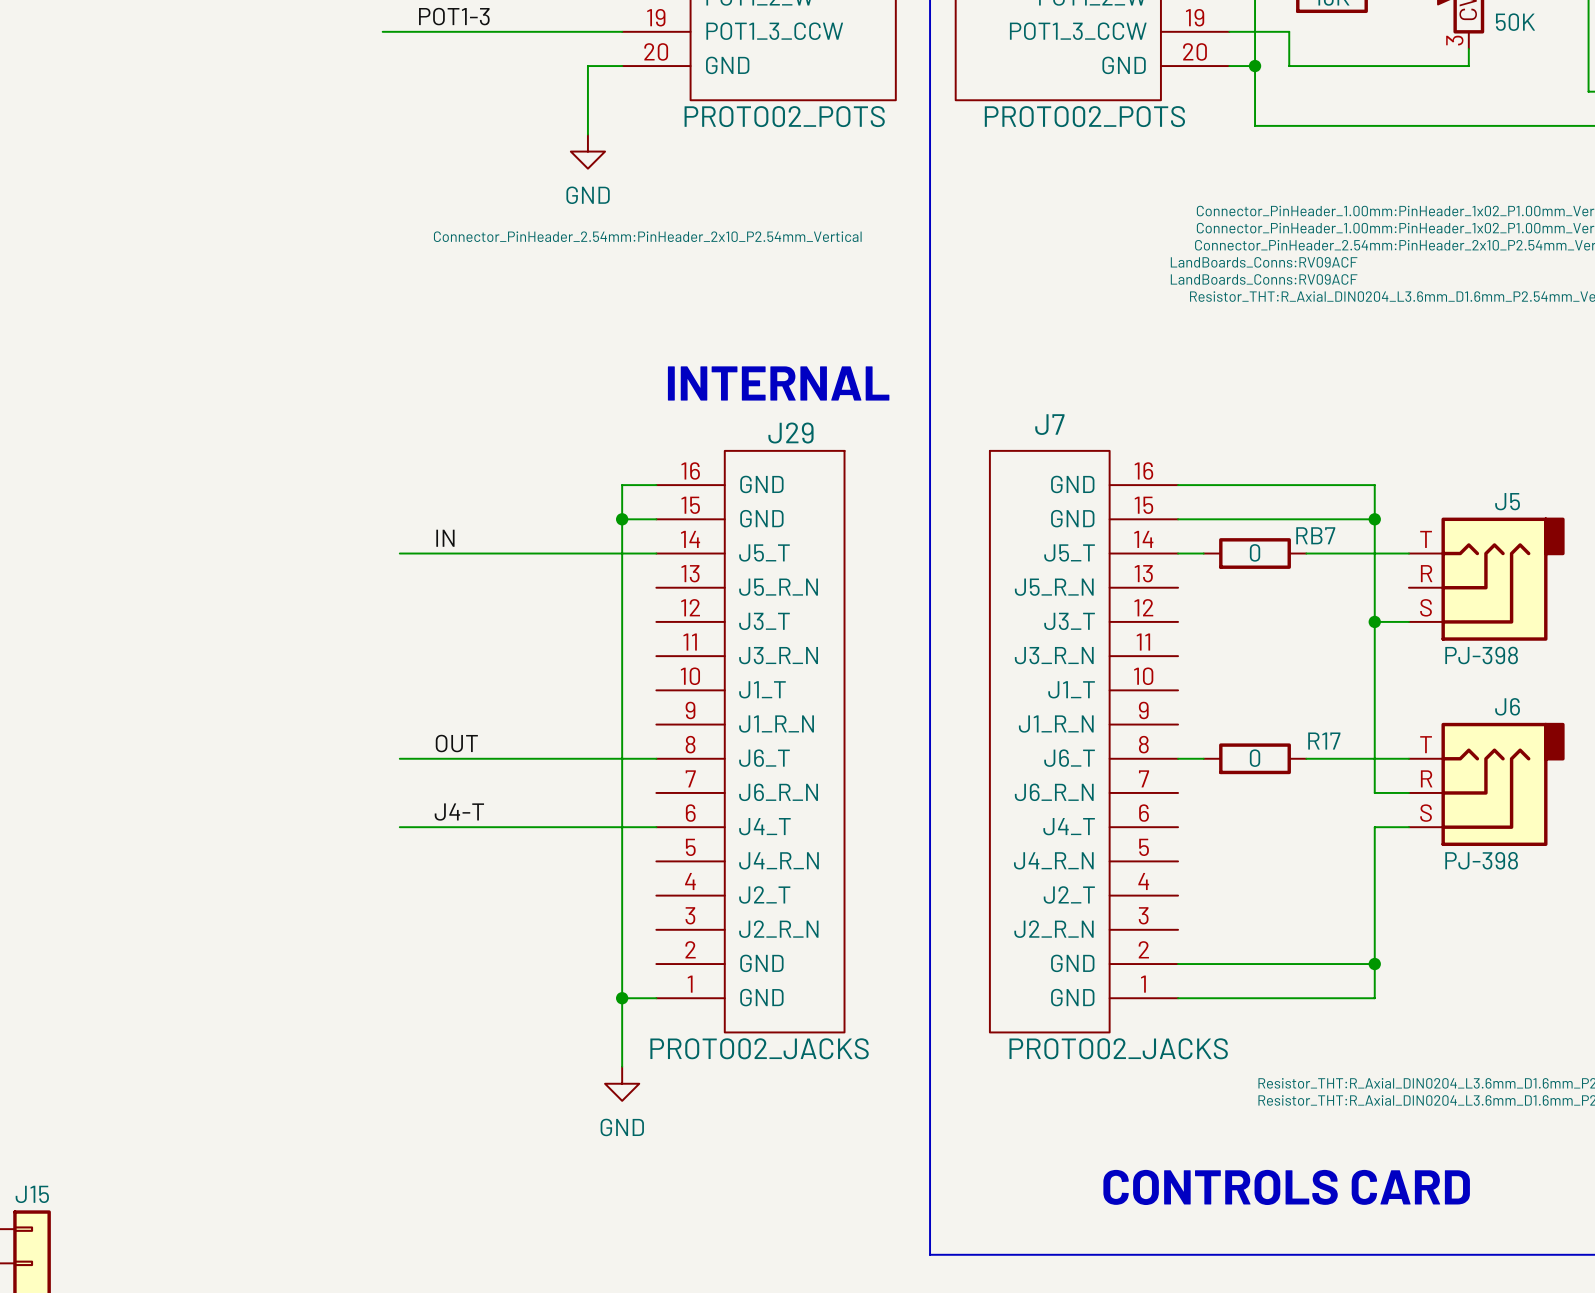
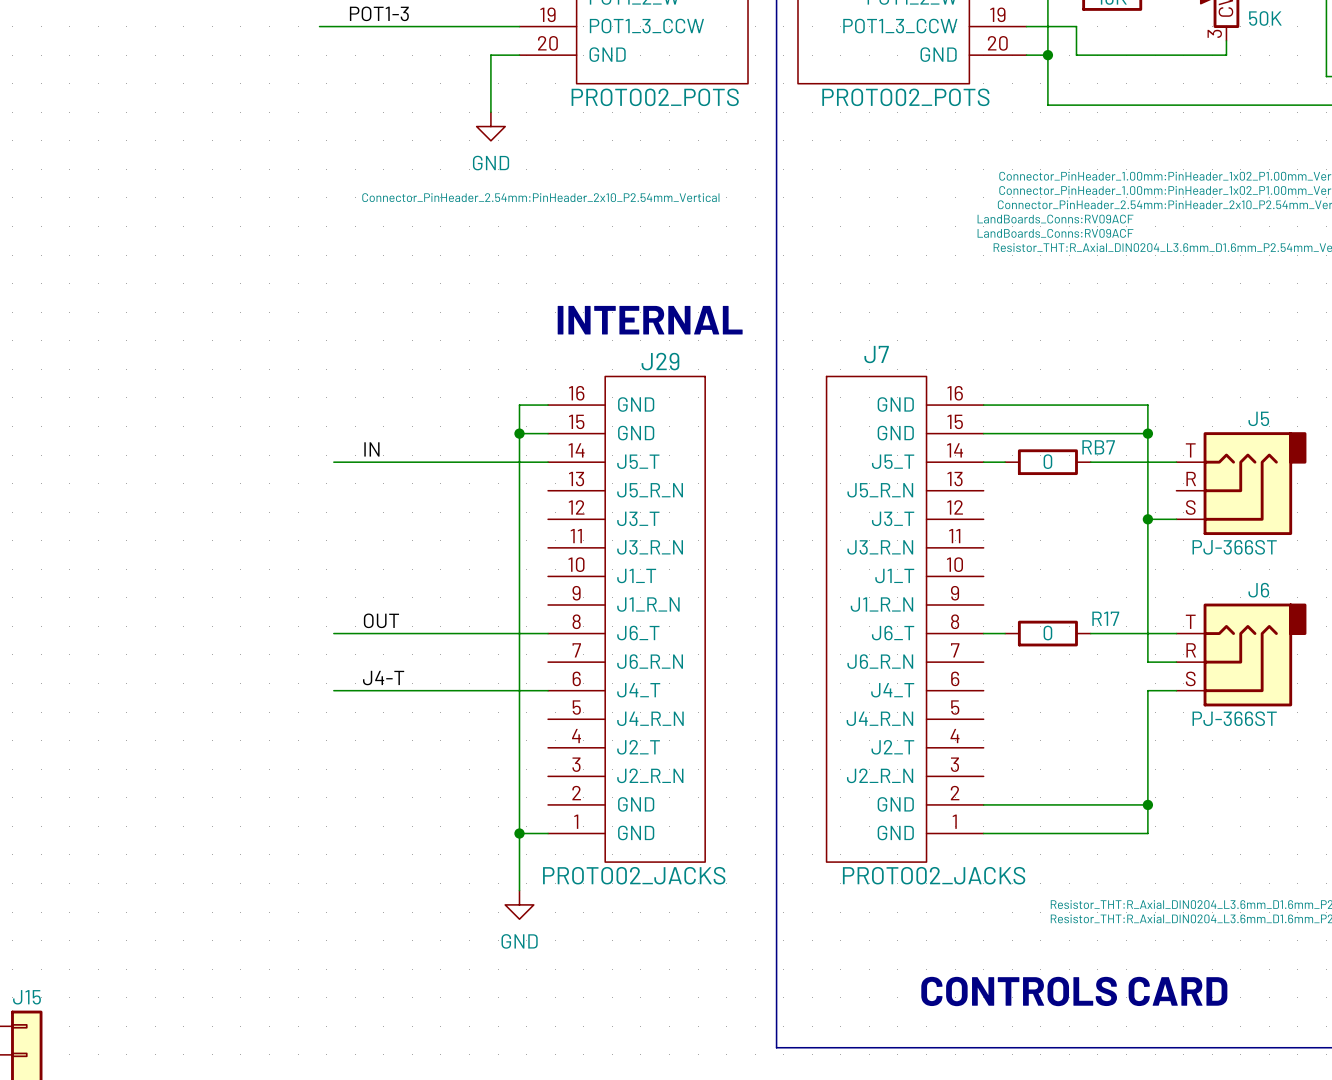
J5 value: PJ-398 (1481, 655) -> PJ-366ST (1234, 547)
J6 value: PJ-398 (1481, 860) -> PJ-366ST (1234, 718)

